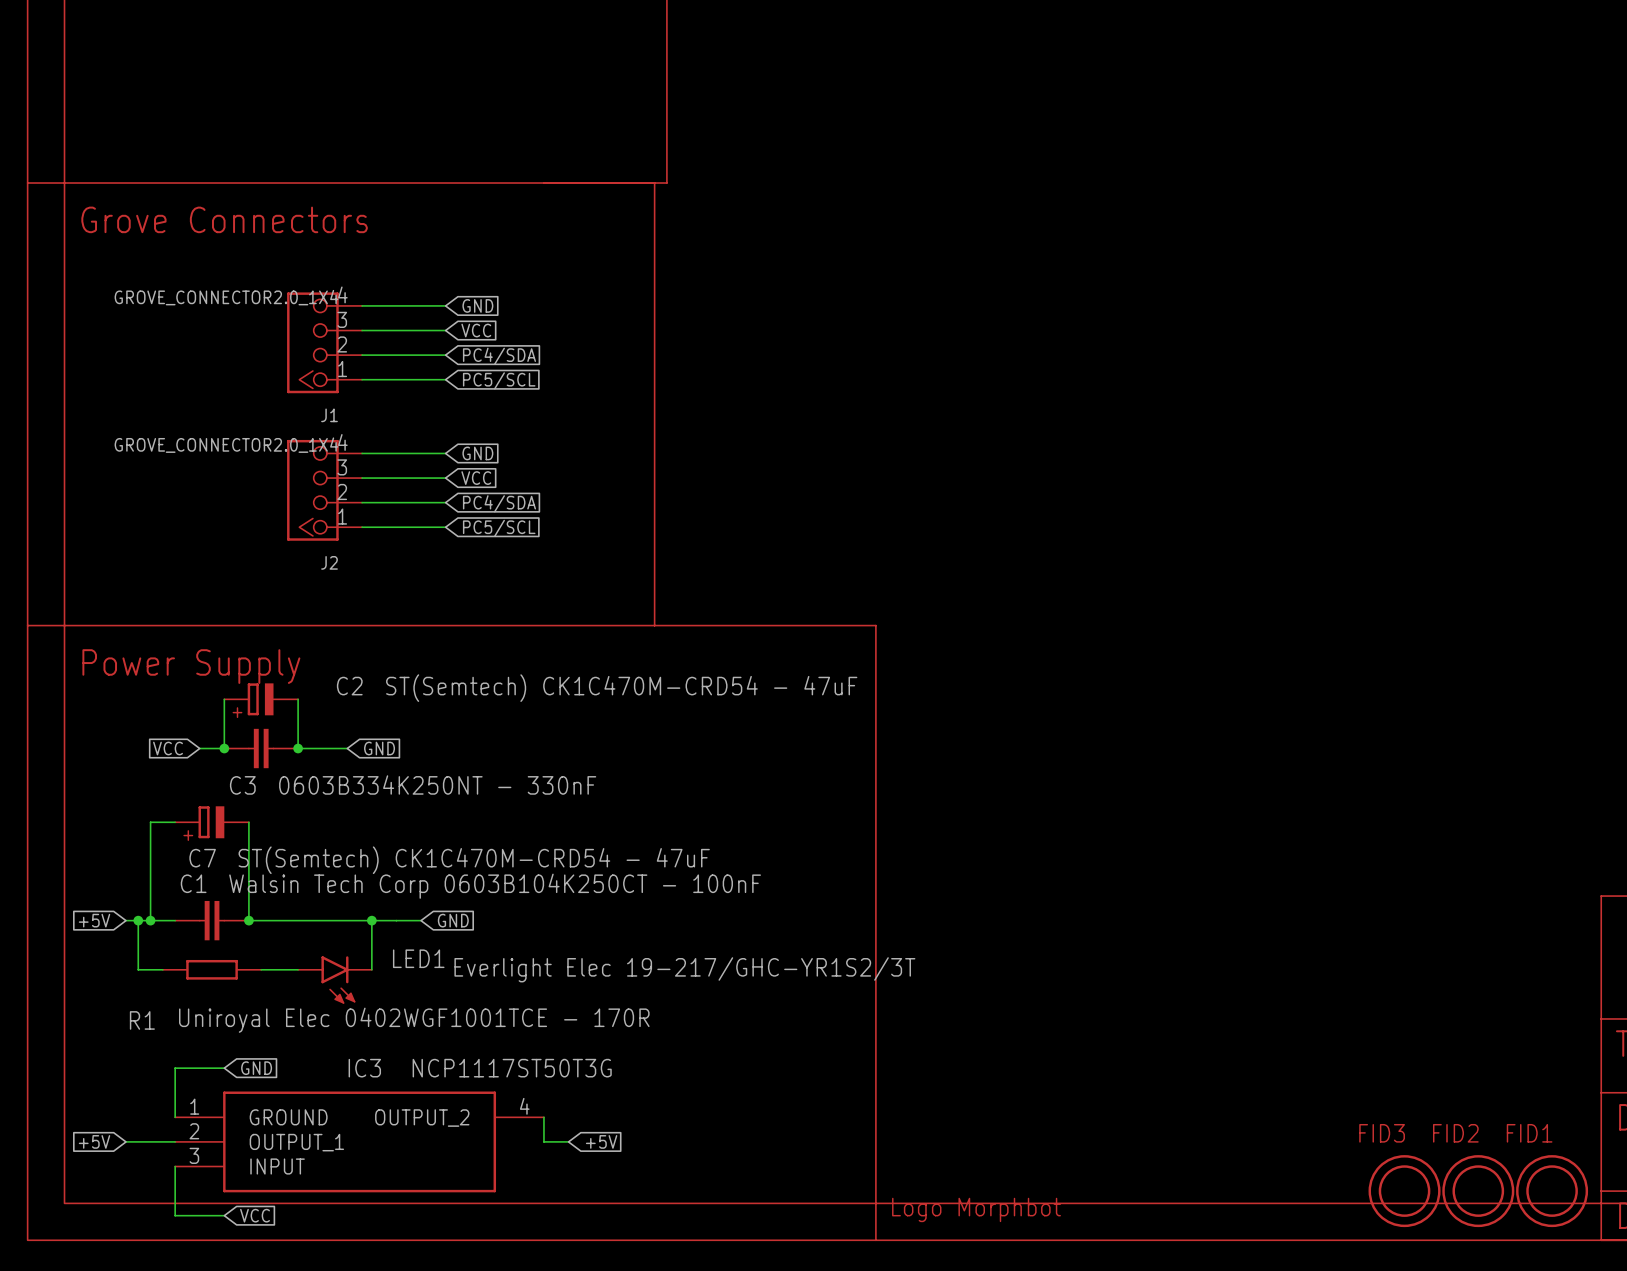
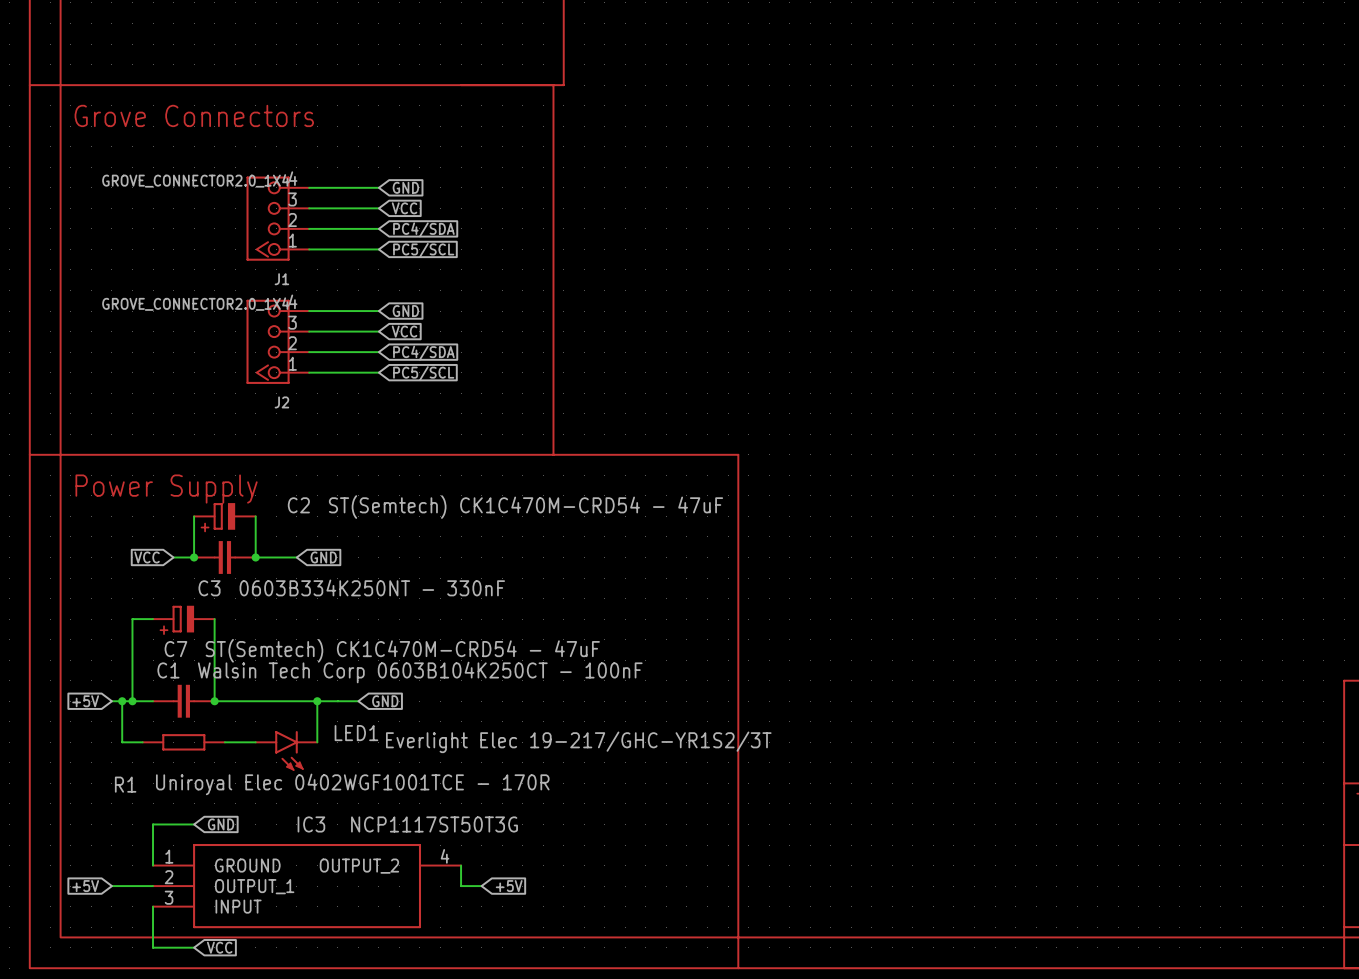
FID3: (1404, 1191) -> none
FID2: (1478, 1191) -> none
FID1: (1552, 1191) -> none
part: (976, 1209) -> none

